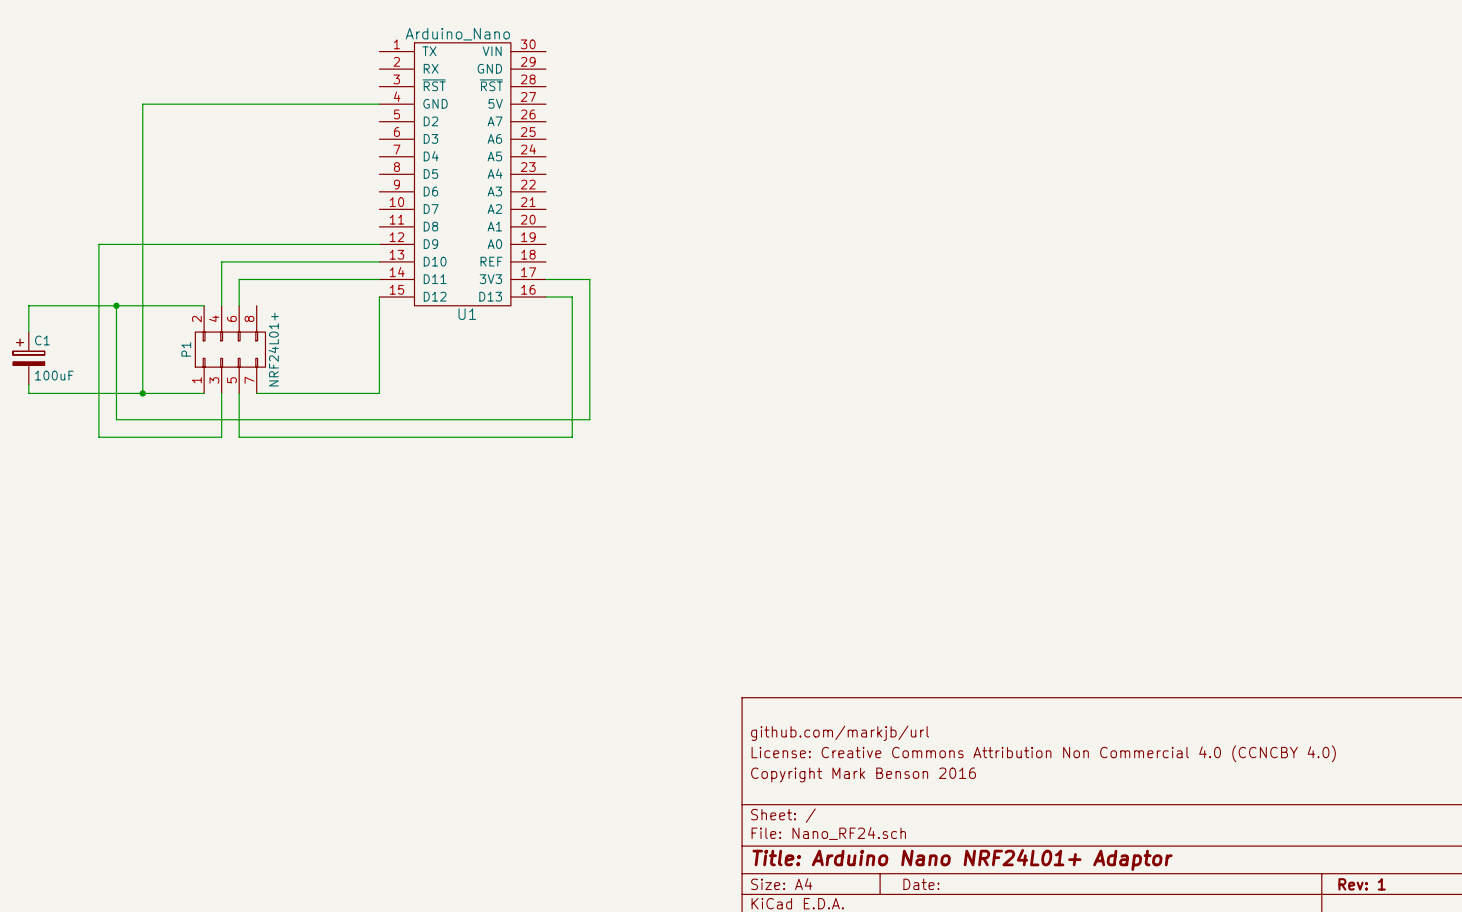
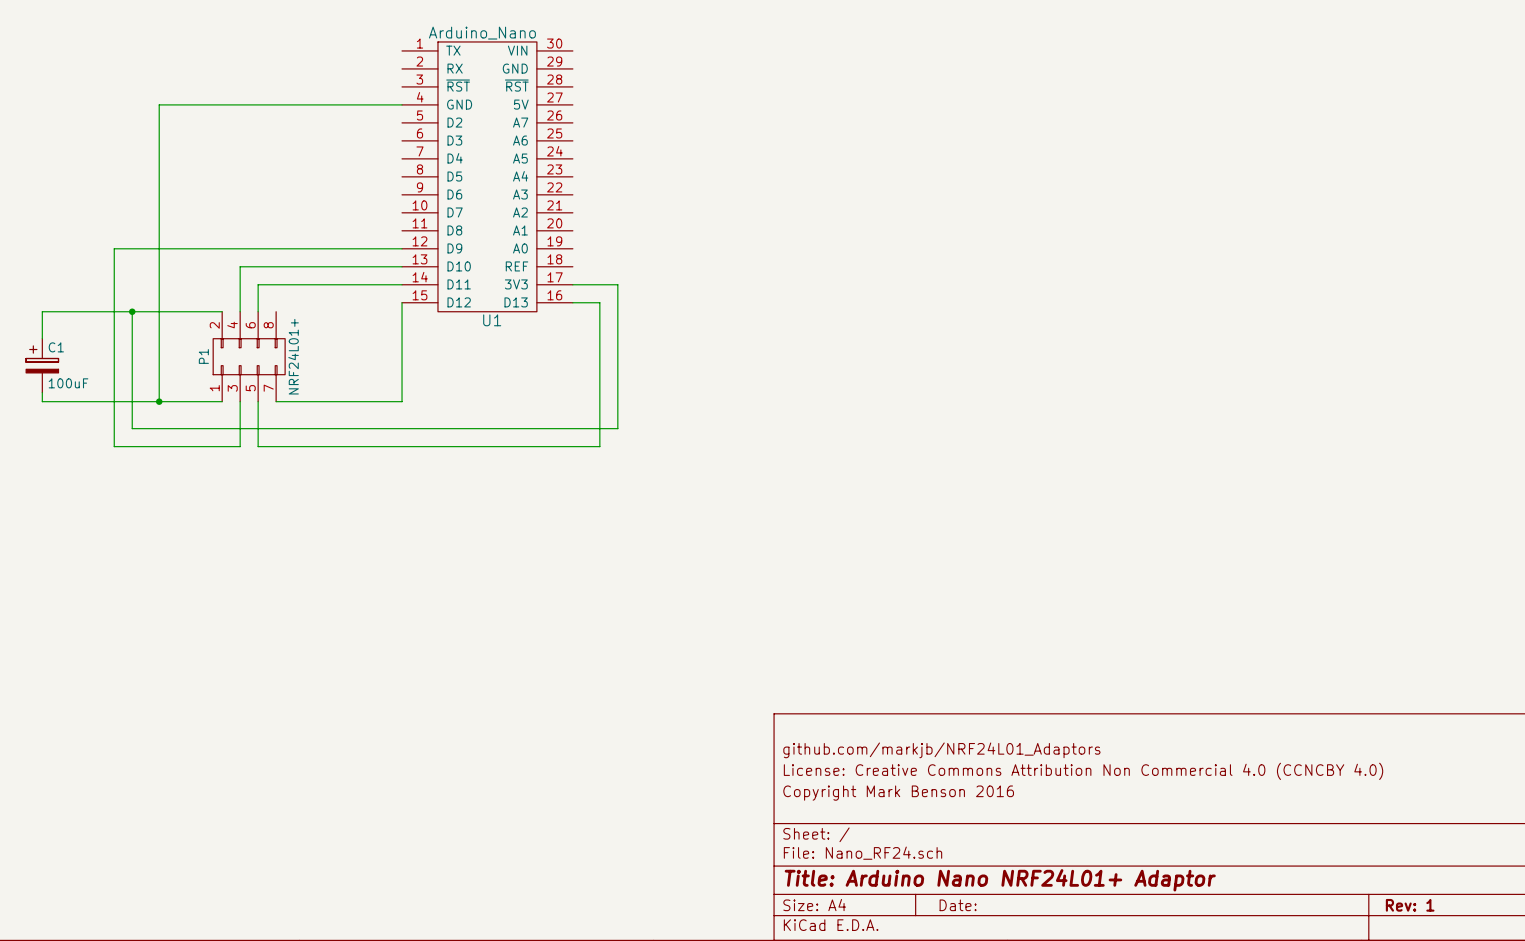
title block: github.com/markjb/url (840, 733) -> github.com/markjb/NRF24L01_Adaptors (941, 750)

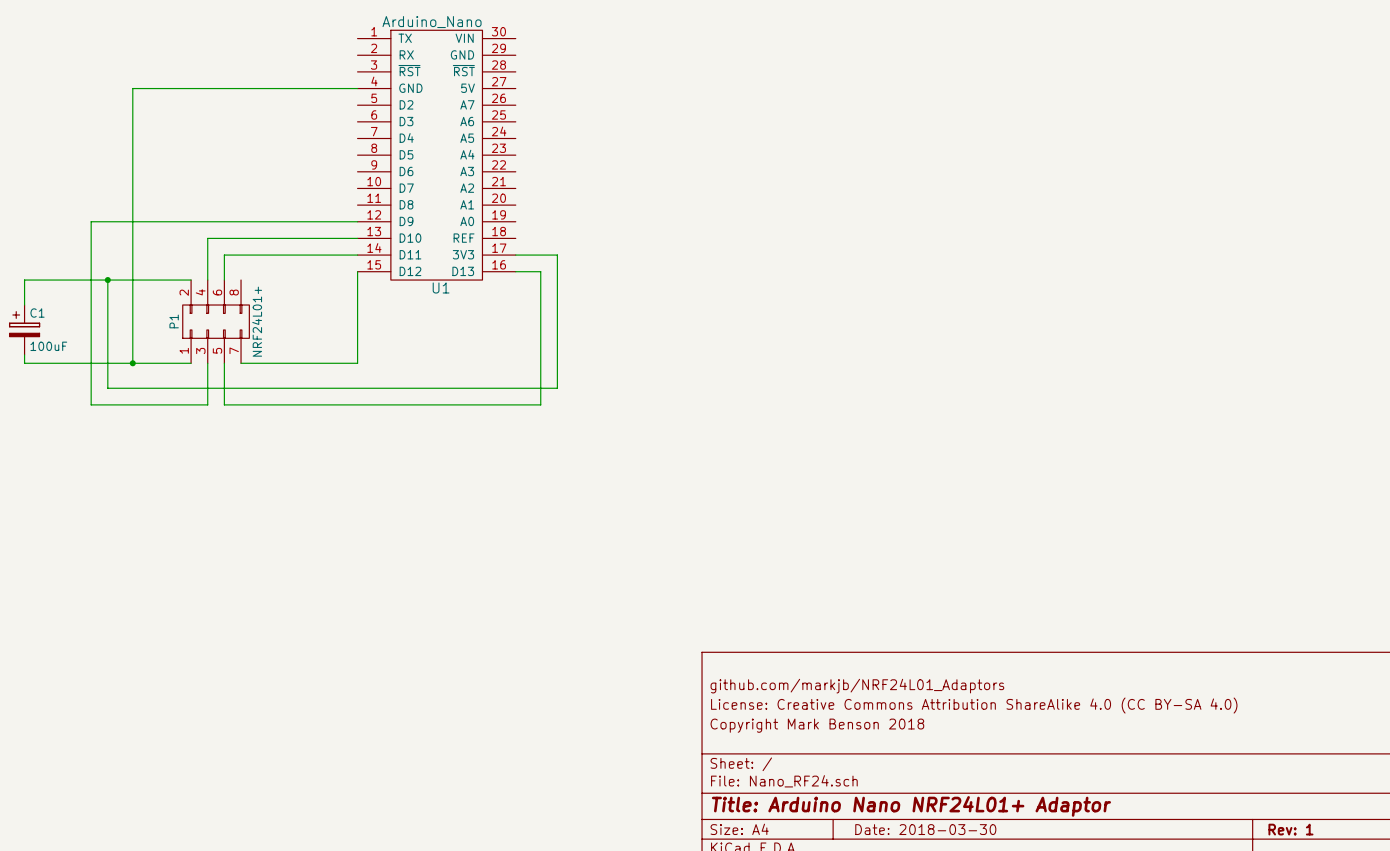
title block: License: Creative Commons Attribution Non Commercial 4.0 (CCNCBY 4.0) (1083, 771) -> License: Creative Commons Attribution ShareAlike 4.0 (CC BY-SA 4.0) (974, 705)
title block: Copyright Mark Benson 2016 (898, 793) -> Copyright Mark Benson 2018 (817, 725)
title block: Date: (958, 905) -> Date: 2018-03-30 (925, 829)

